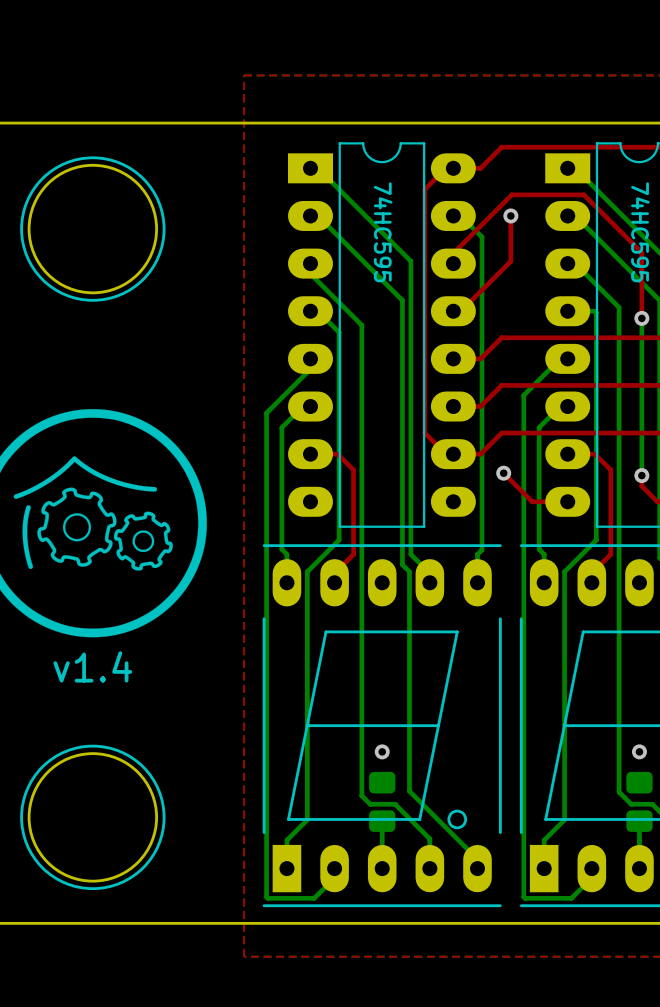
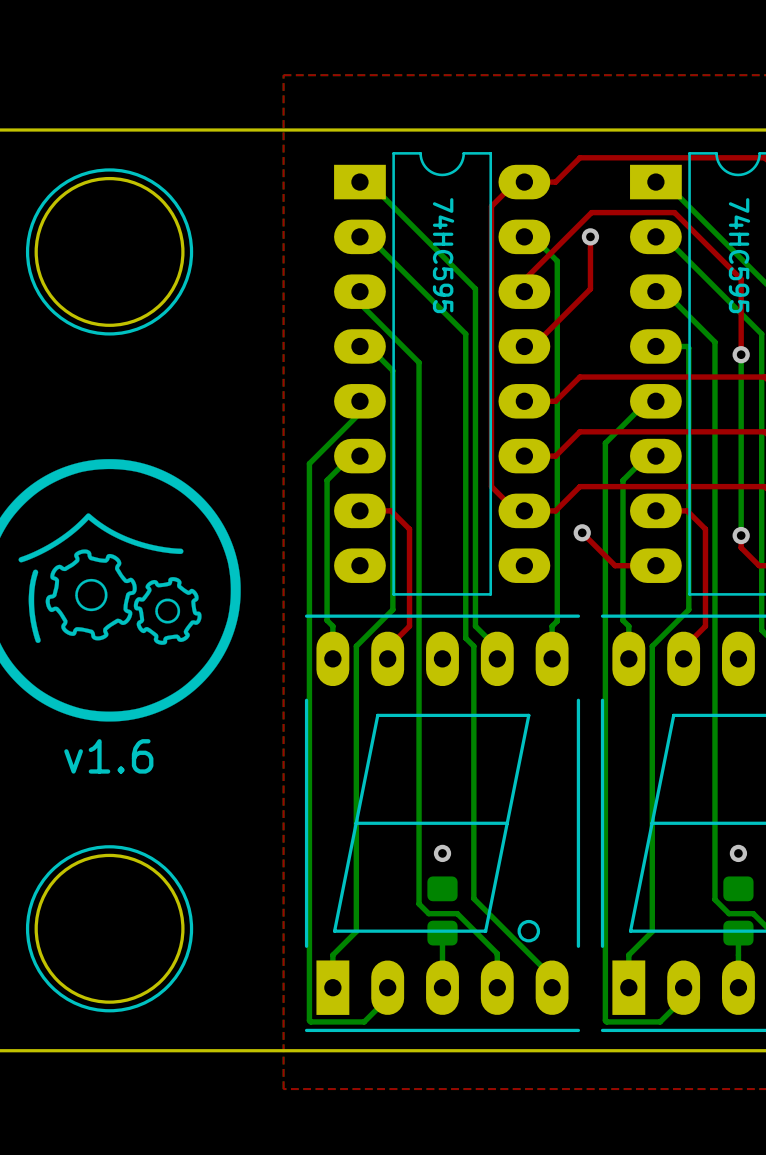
text: v1.4 (92, 666) -> v1.6 (108, 756)

